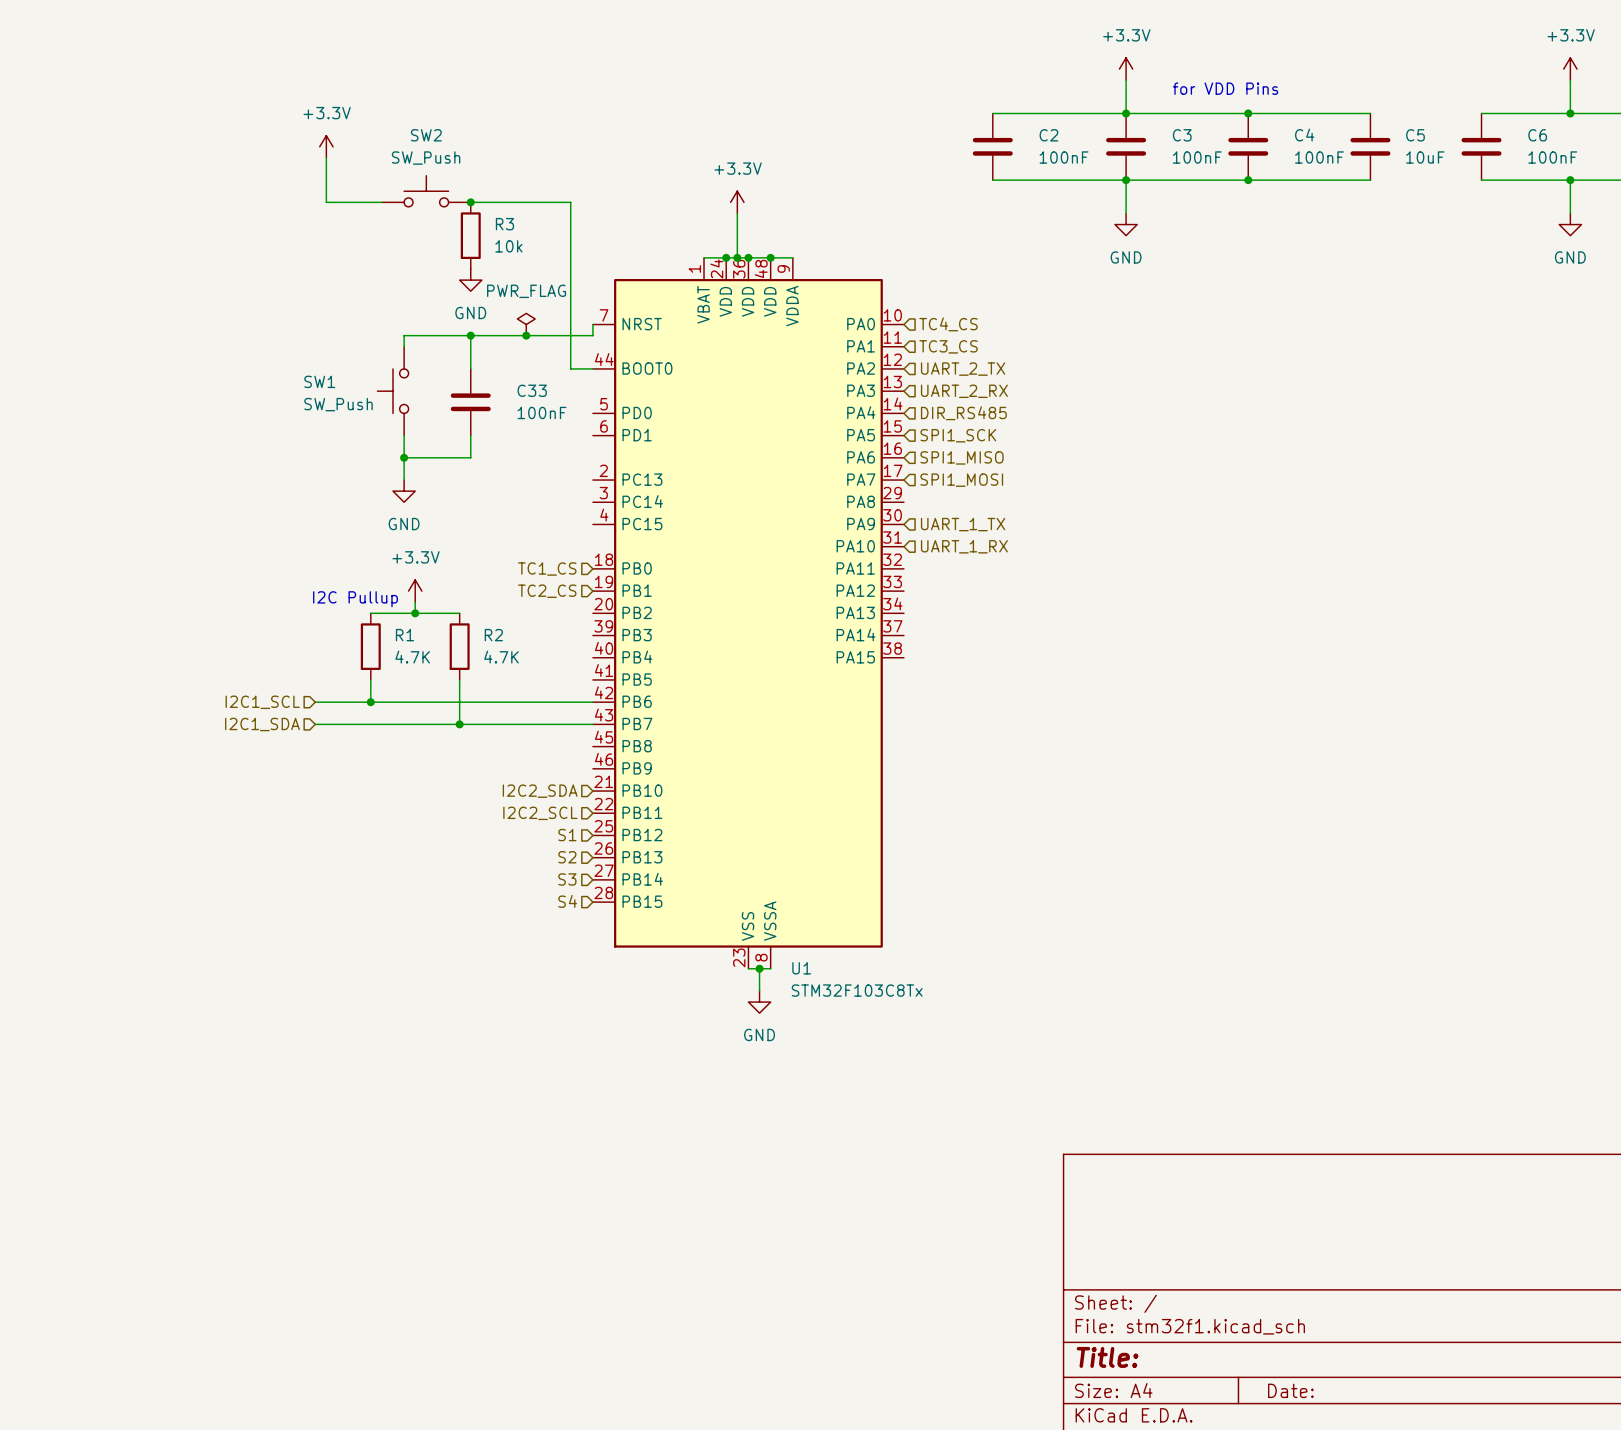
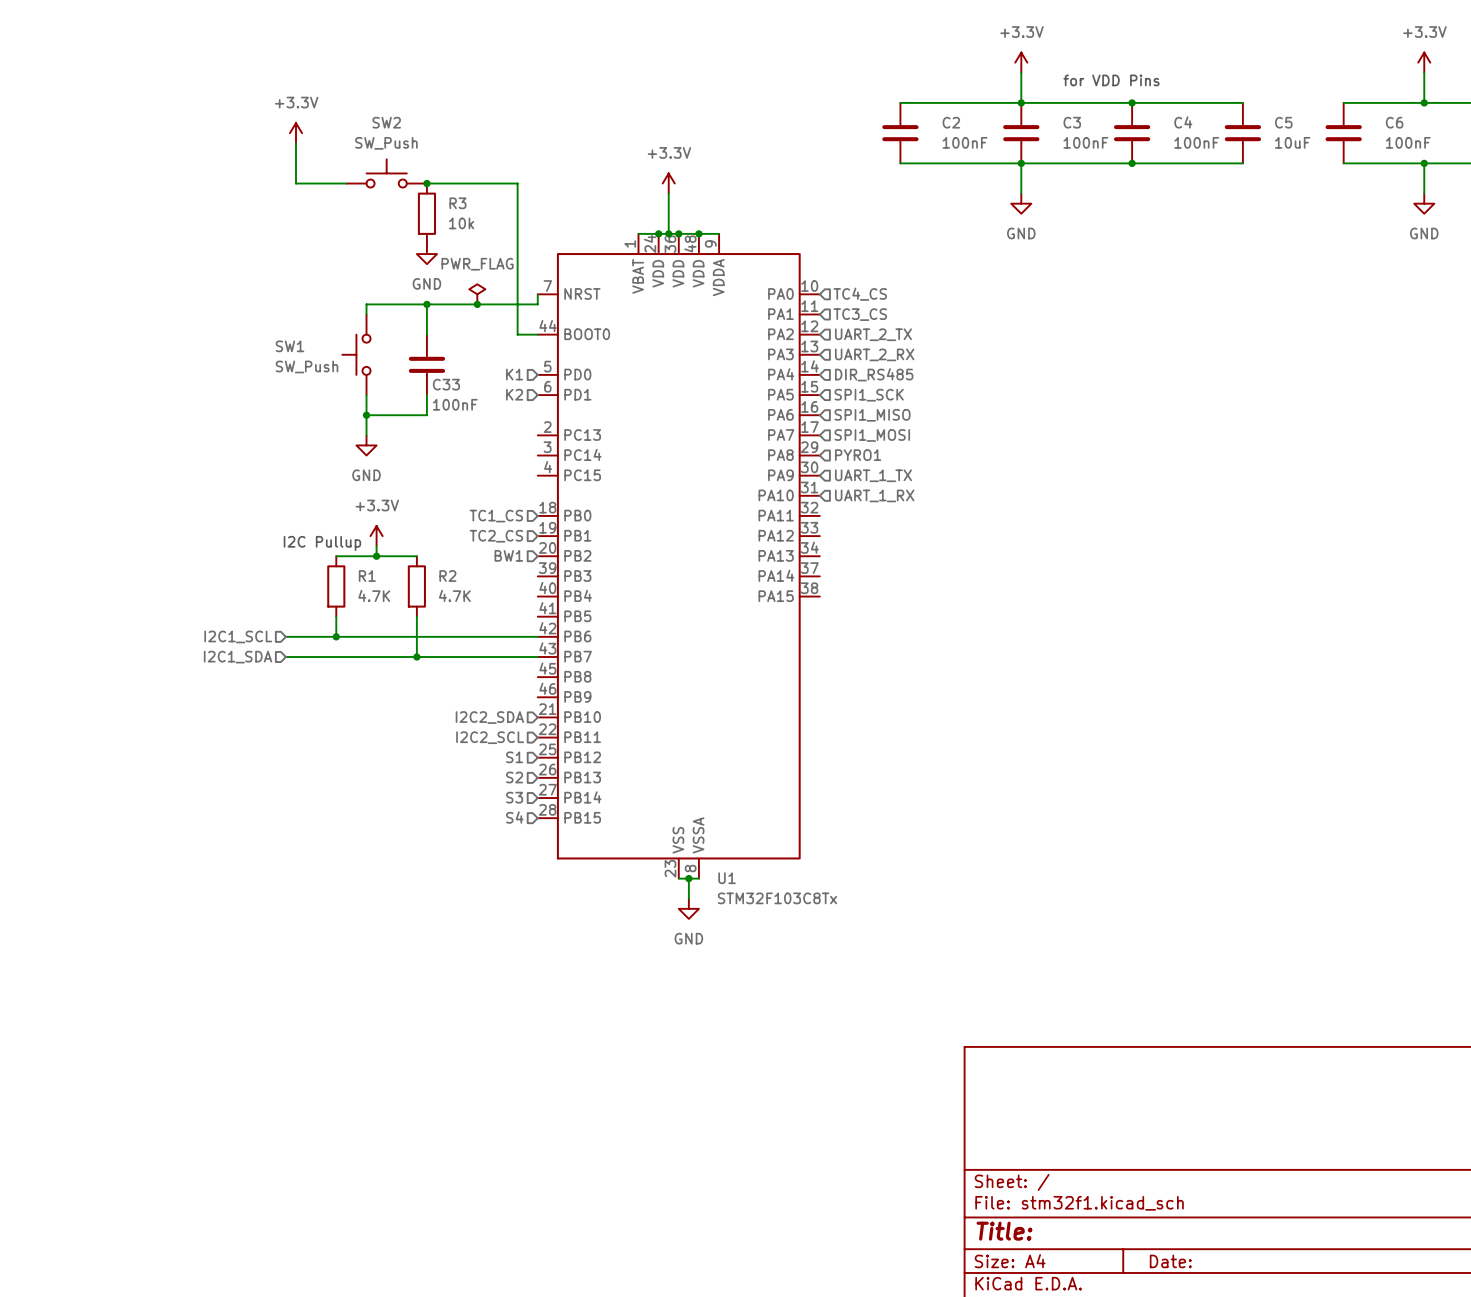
C33 name position: C33 (532, 390) -> C33 (446, 384)
C33 value position: 100nF (541, 412) -> 100nF (455, 404)
hierarchical label: none -> K1 (514, 374)
hierarchical label: none -> K2 (514, 394)
hierarchical label: none -> PYRO1 (858, 455)
hierarchical label: none -> BW1 (508, 555)

